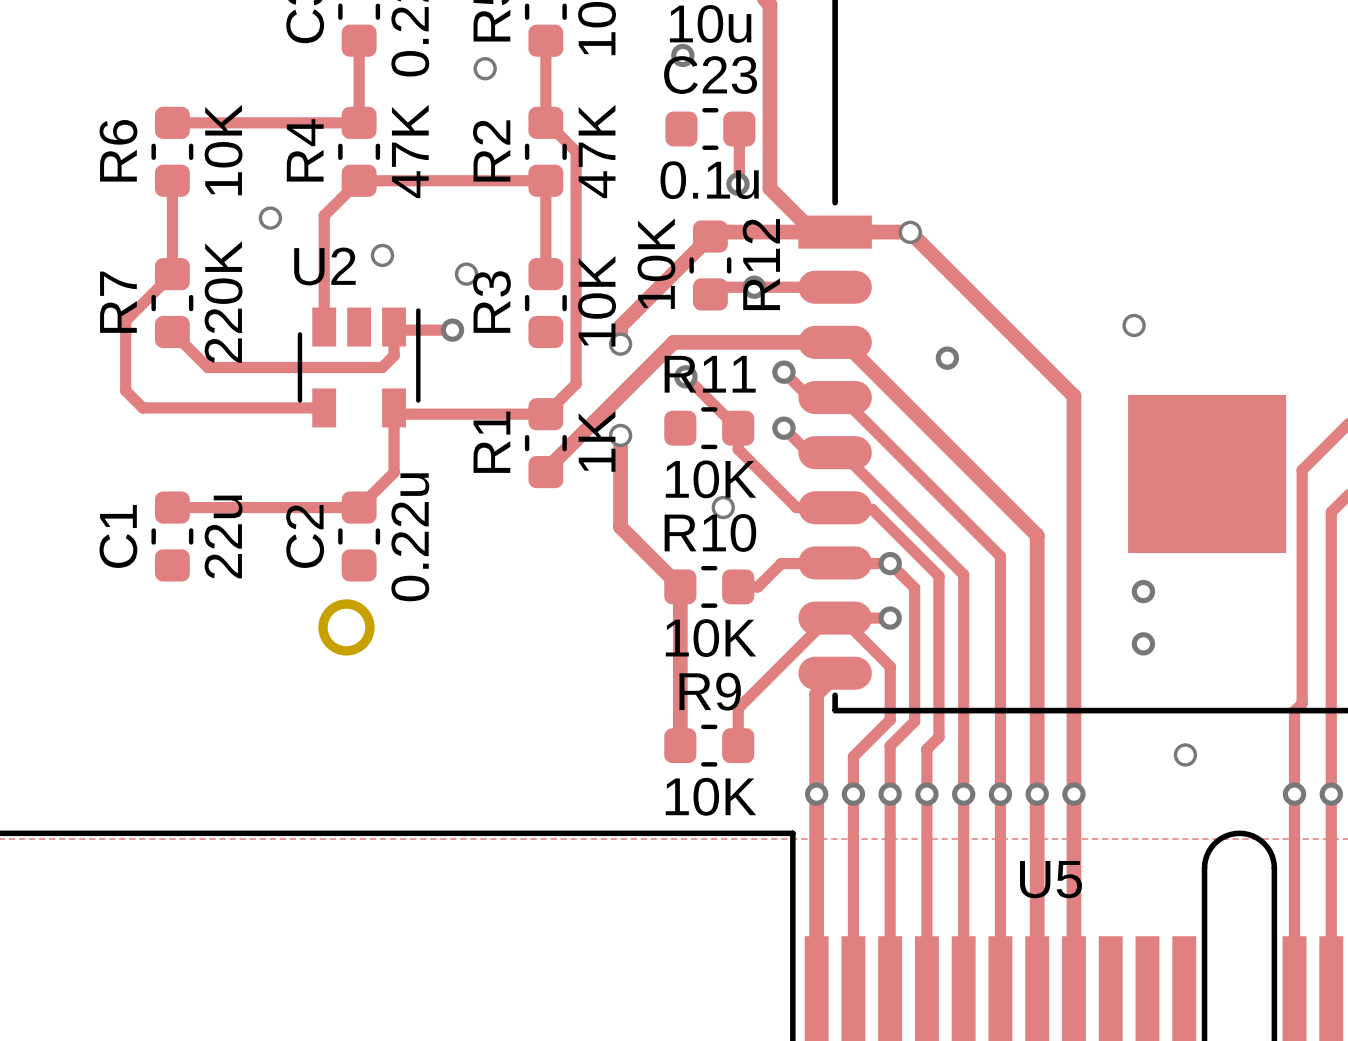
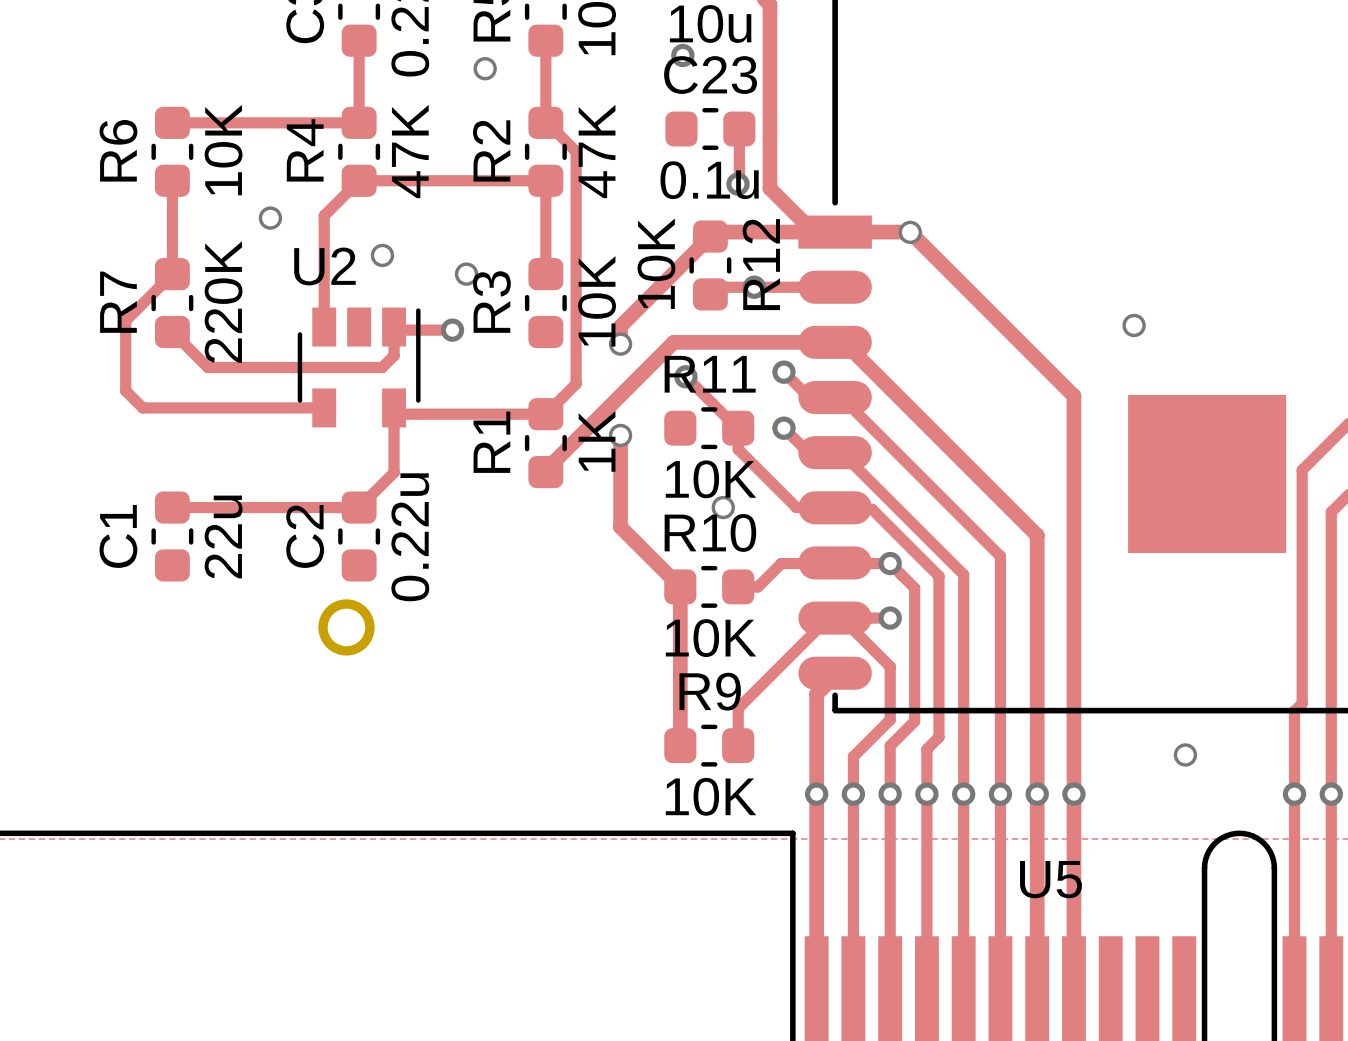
via: (947, 358) -> none
via: (1143, 591) -> none
via: (1143, 643) -> none

